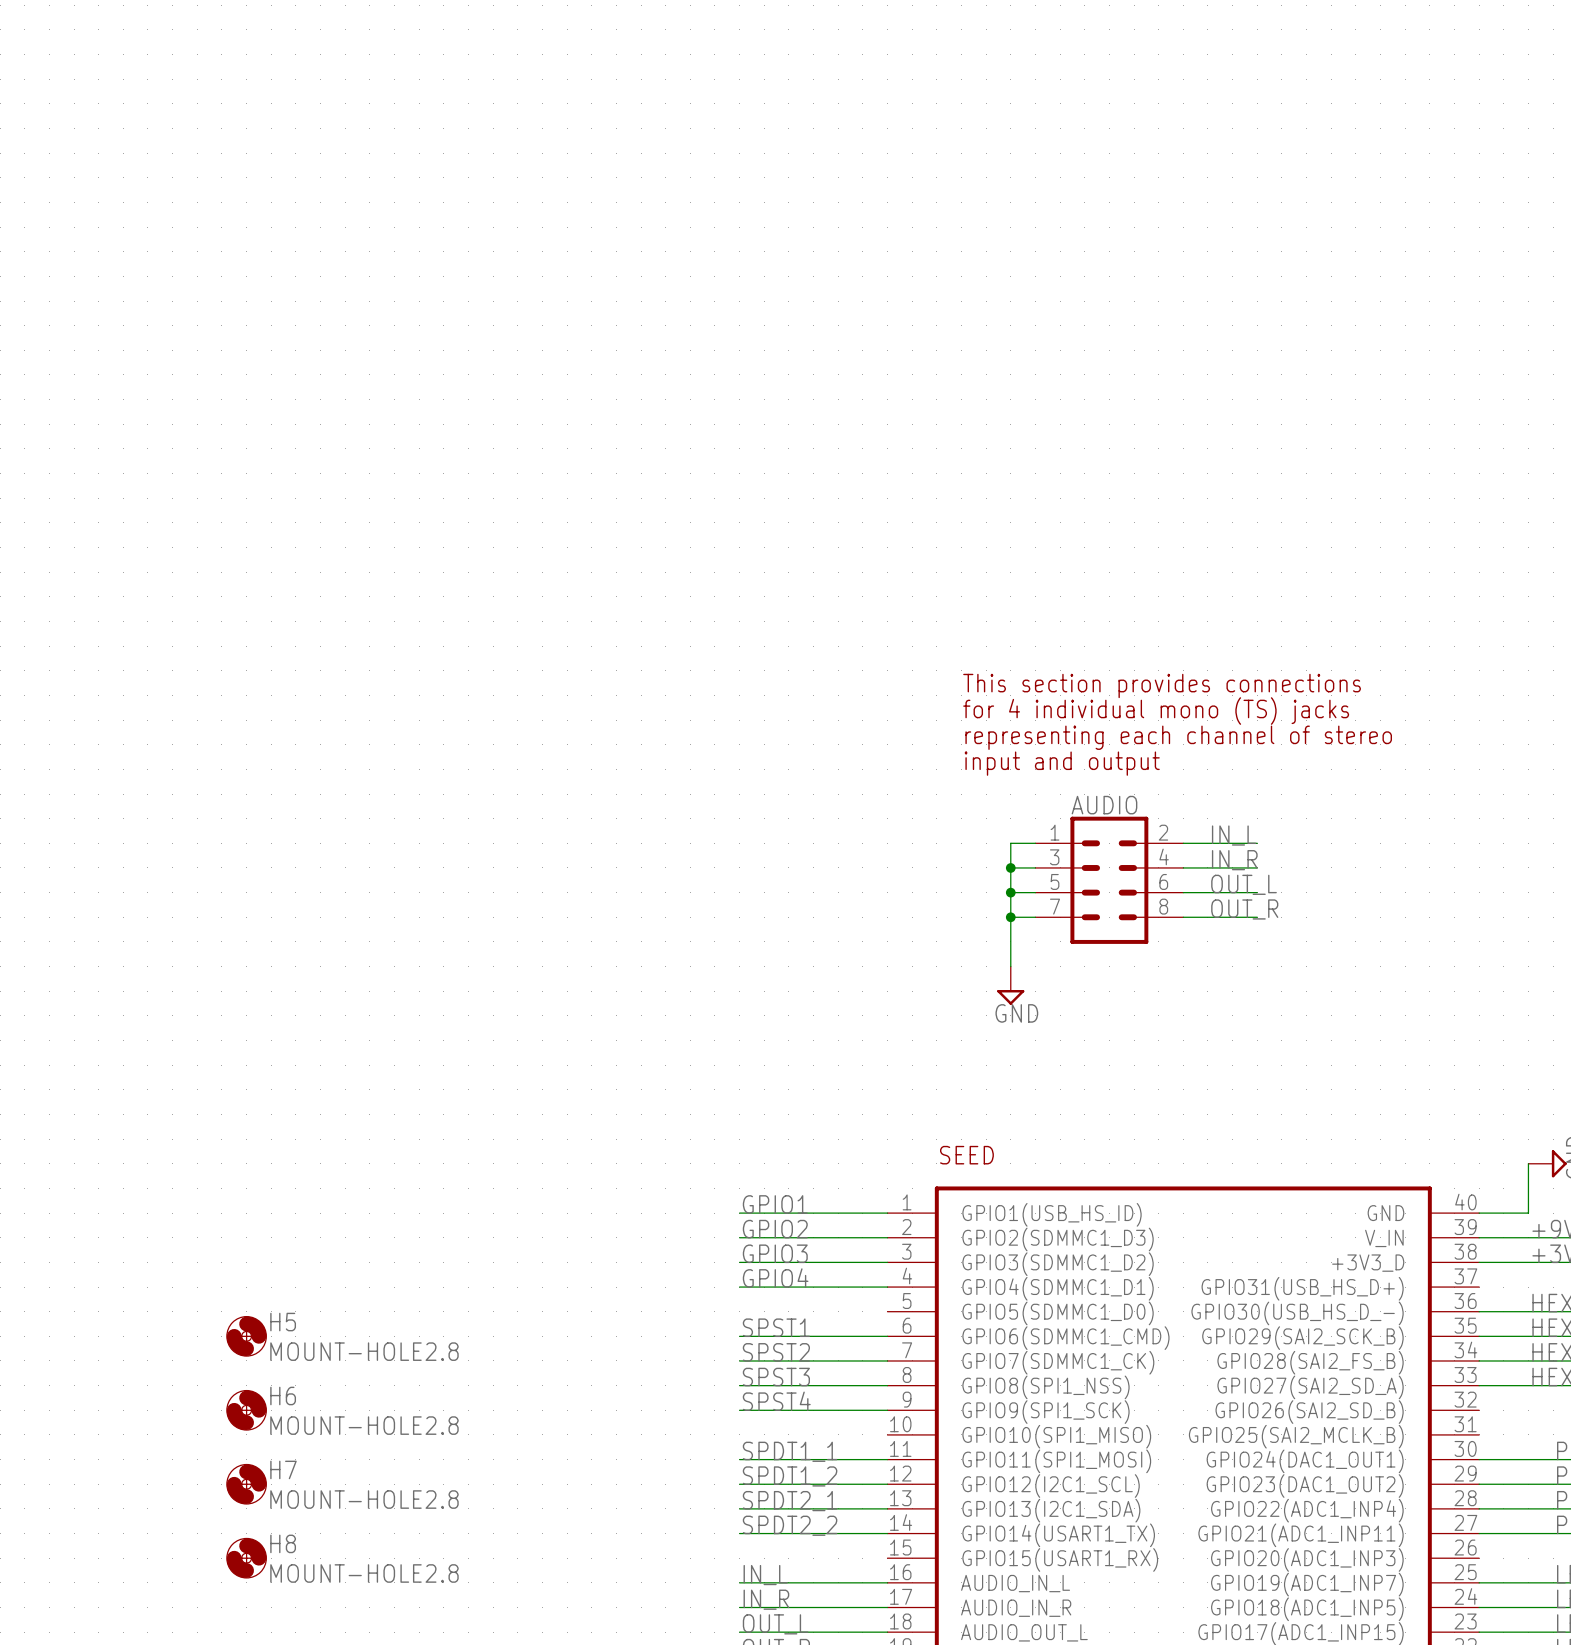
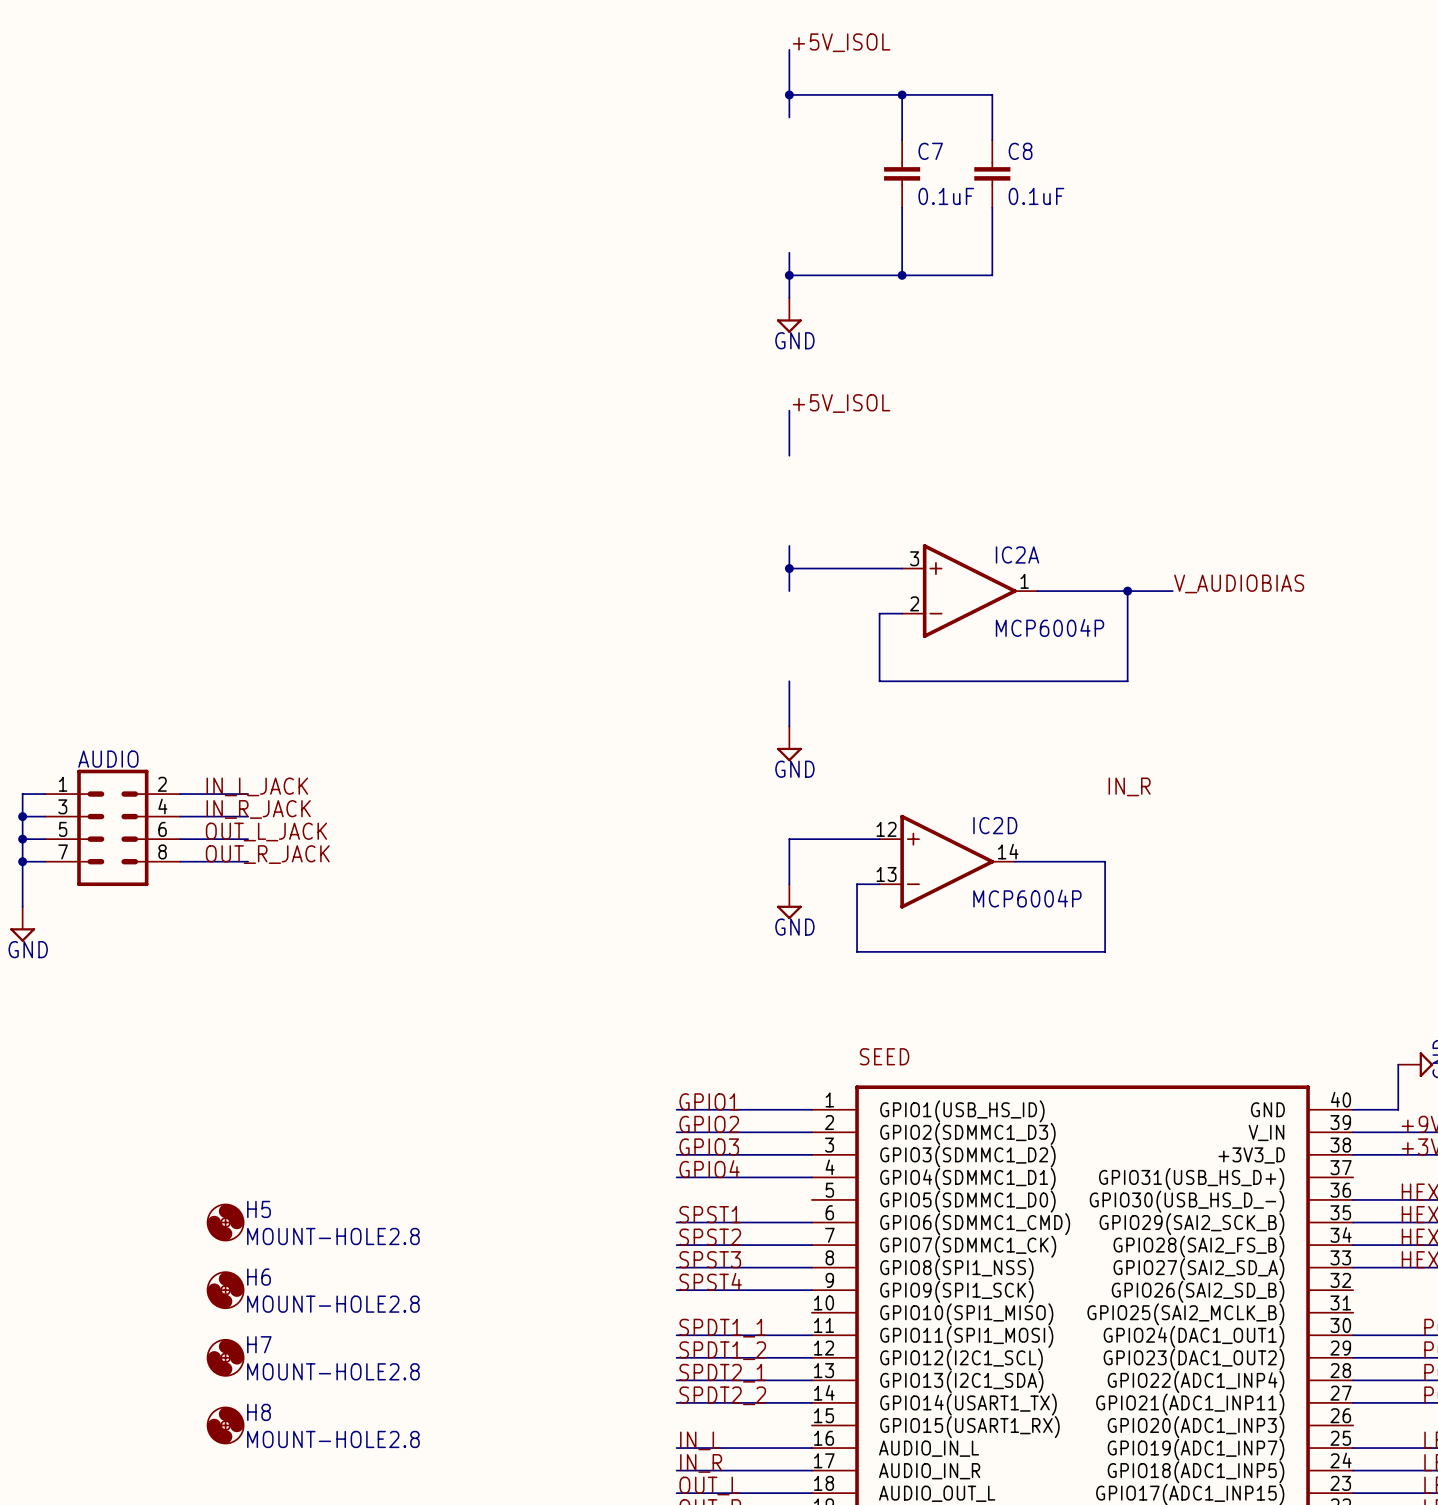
label: none -> +5V_ISOL (841, 42)
wire: none -> (789, 49) (789, 117)
wire: none -> (789, 94) (992, 94) (992, 140)
junction: none -> (789, 94)
wire: none -> (902, 94) (902, 140)
junction: none -> (902, 94)
C7: none -> 0.1uF (902, 173)
C8: none -> 0.1uF (992, 173)
wire: none -> (902, 207) (902, 275)
wire: none -> (992, 207) (992, 275) (789, 275)
wire: none -> (789, 252) (789, 297)
junction: none -> (789, 275)
junction: none -> (902, 275)
power symbol: none -> GND (789, 315)
label: none -> +5V_ISOL (841, 403)
wire: none -> (789, 410) (789, 455)
wire: none -> (789, 545) (789, 591)
wire: none -> (789, 568) (902, 568)
junction: none -> (789, 568)
label: none -> V_AUDIOBIAS (1239, 583)
IC2A: none -> MCP6004P (969, 591)
wire: none -> (1037, 591) (1172, 591)
wire: none -> (1127, 591) (1127, 681) (879, 681) (879, 613) (902, 613)
junction: none -> (1127, 591)
text: This section provides connections (1162, 685) -> none
text: for 4 individual mono (TS) jacks (1156, 711) -> none
text: representing each channel of stereo (1178, 737) -> none
wire: none -> (789, 681) (789, 726)
text: input and output (1062, 763) -> none
power symbol: none -> GND (789, 743)
label: IN_L (1234, 835) -> none
wire: (1035, 843) (1010, 843) (1010, 966) -> none
wire: (1183, 843) (1257, 843) -> none
label: none -> IN_L_JACK (257, 786)
wire: none -> (45, 794) (22, 794) (22, 906)
wire: none -> (180, 794) (248, 794)
wire: (1010, 867) (1035, 867) -> none
junction: (1010, 867) -> none
wire: (1183, 867) (1257, 867) -> none
AUDIO: (1109, 880) -> none
label: none -> IN_R_JACK (258, 809)
label: OUT_L (1244, 884) -> none
wire: none -> (22, 816) (45, 816)
junction: none -> (22, 816)
wire: none -> (180, 816) (248, 816)
wire: (1010, 892) (1035, 892) -> none
junction: (1010, 892) -> none
wire: (1183, 892) (1257, 892) -> none
AUDIO: none -> (112, 827)
label: none -> OUT_L_JACK (266, 832)
label: OUT_R (1244, 909) -> none
wire: none -> (22, 839) (45, 839)
junction: none -> (22, 839)
wire: none -> (180, 839) (248, 839)
wire: none -> (879, 839) (789, 839) (789, 884)
wire: (1010, 917) (1035, 917) -> none
junction: (1010, 917) -> none
wire: (1183, 917) (1257, 917) -> none
label: none -> OUT_R_JACK (267, 854)
wire: none -> (22, 861) (45, 861)
junction: none -> (22, 861)
wire: none -> (180, 861) (248, 861)
IC2D: none -> MCP6004P (947, 861)
wire: none -> (1014, 861) (1105, 861) (1105, 951) (857, 951) (857, 884) (879, 884)
power symbol: none -> GND (789, 901)
power symbol: GND (1010, 985) -> none
power symbol: none -> GND (22, 924)

